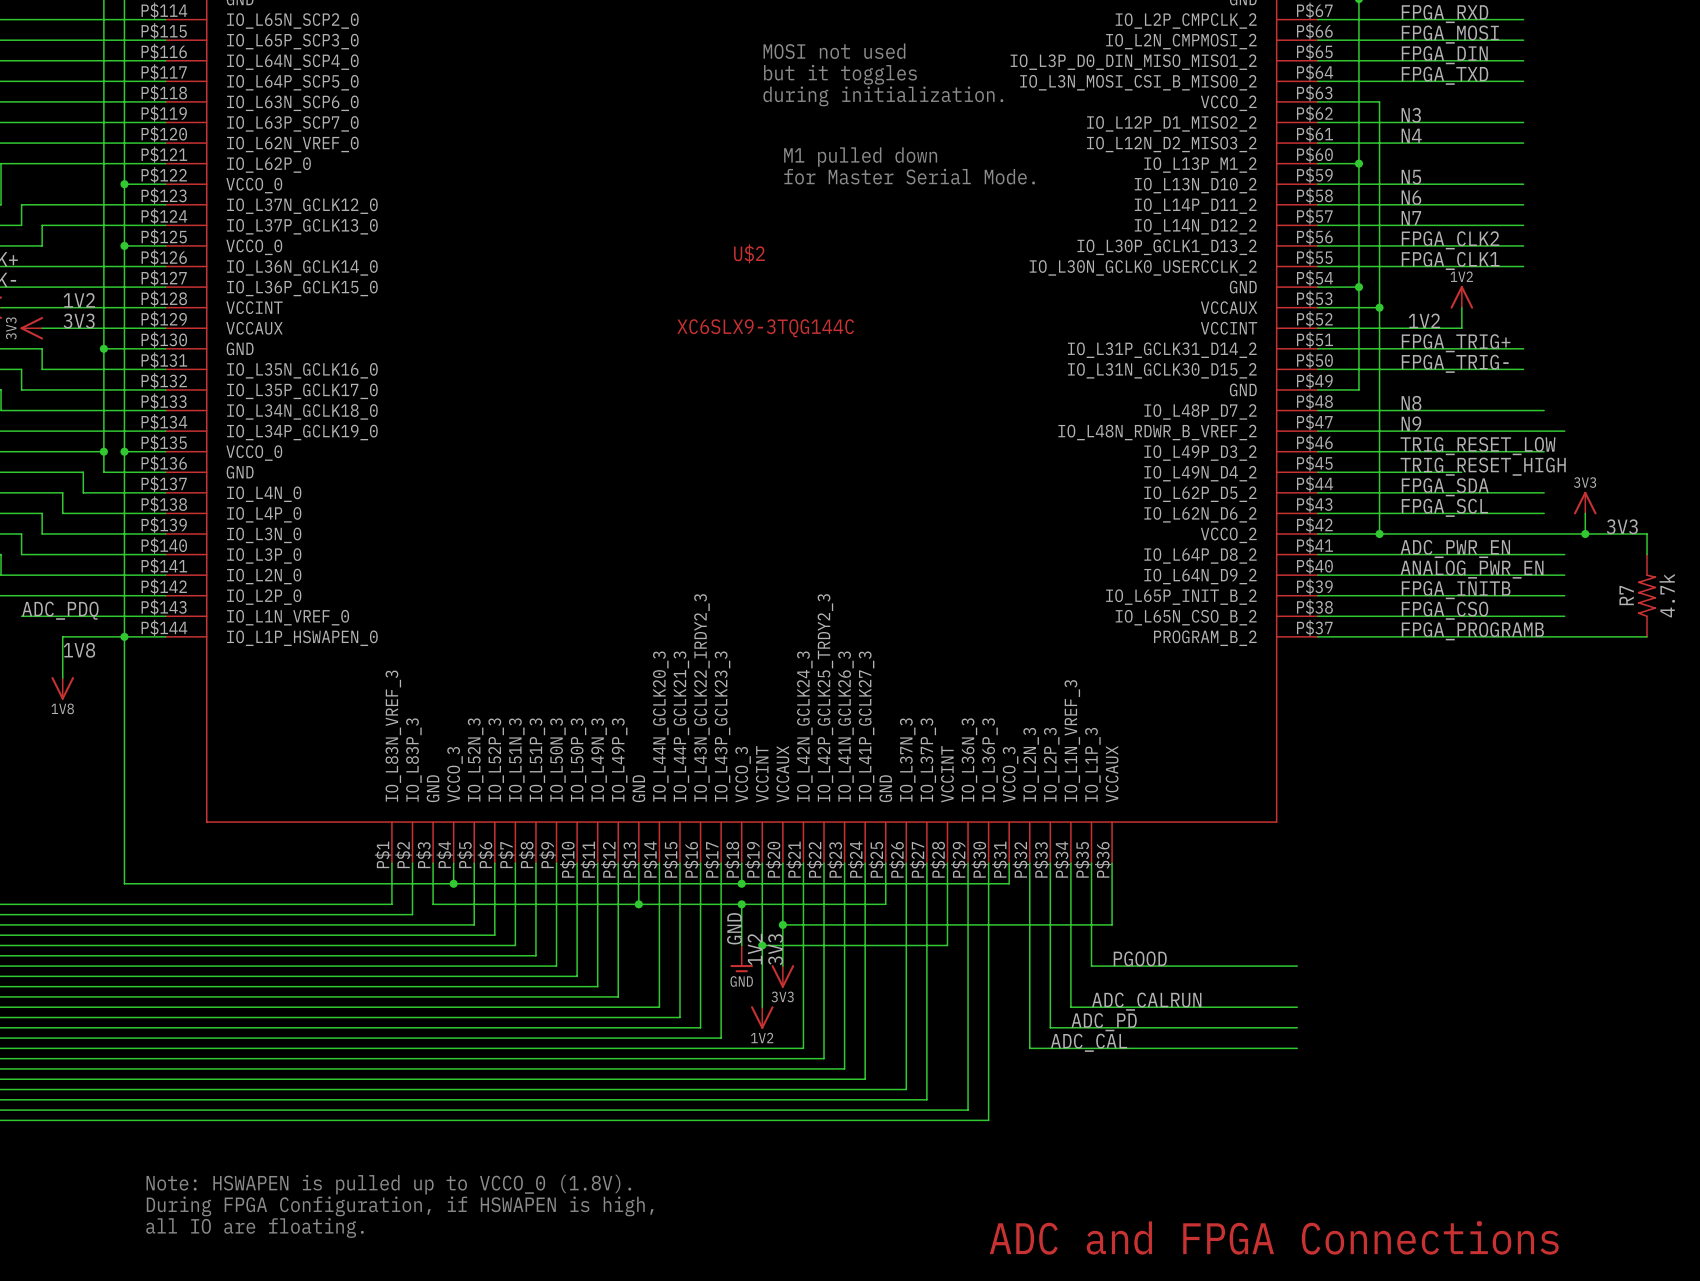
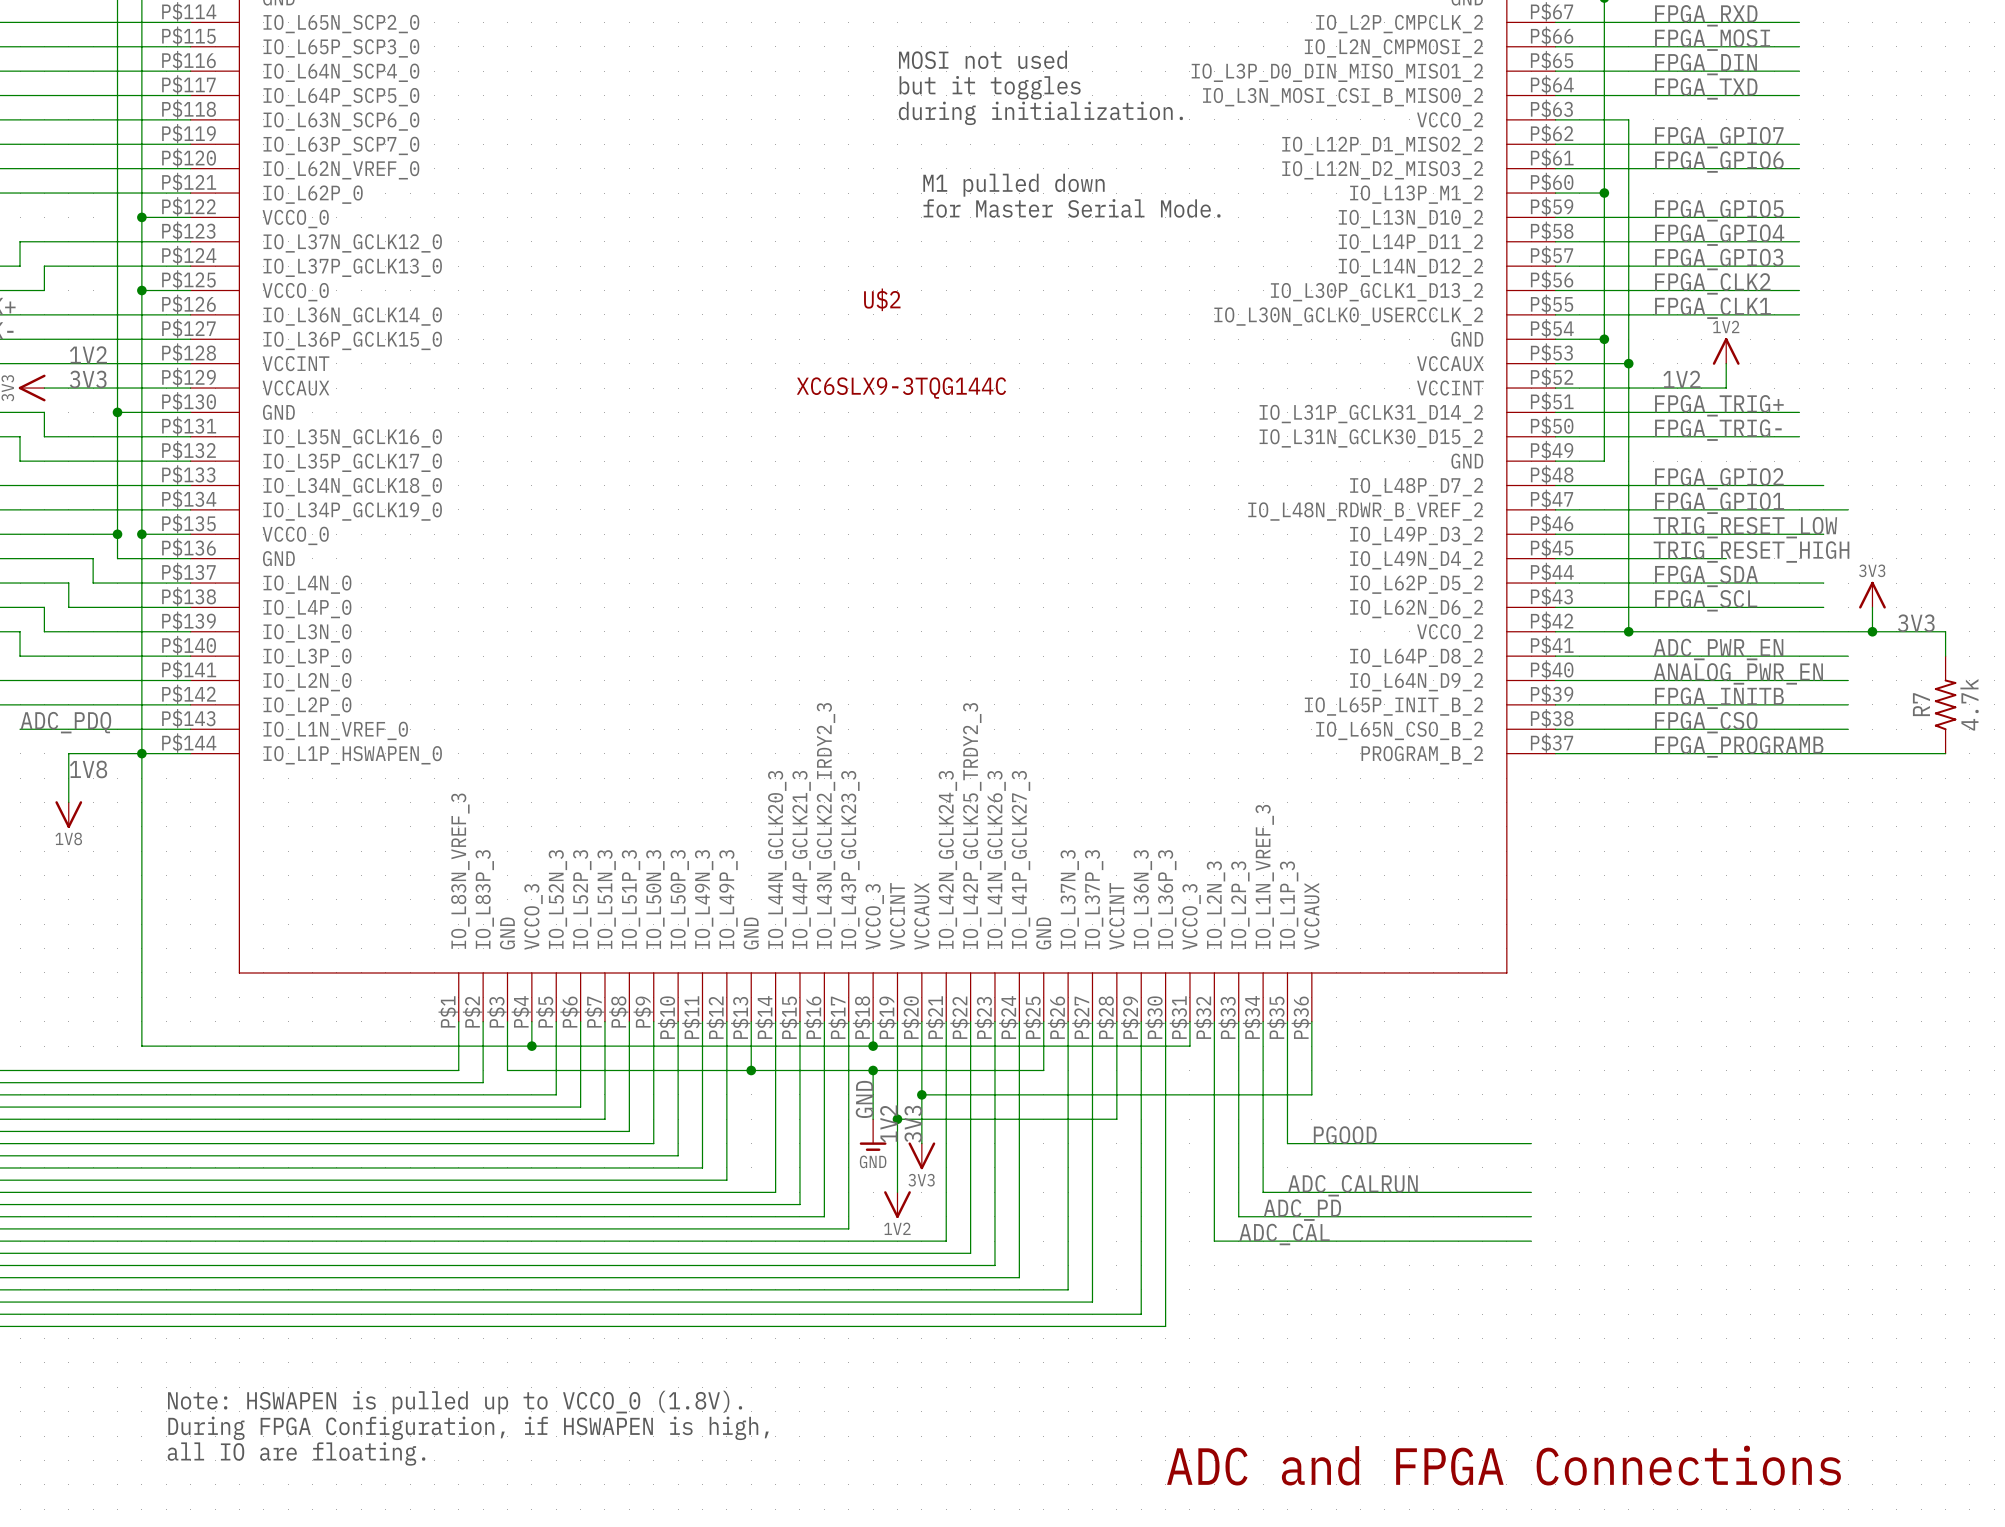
label: N3 (1411, 115) -> FPGA_GPIO7 (1719, 137)
label: N4 (1411, 135) -> FPGA_GPIO6 (1719, 162)
label: N5 (1411, 177) -> FPGA_GPIO5 (1719, 210)
label: N6 (1411, 197) -> FPGA_GPIO4 (1719, 235)
label: N7 (1411, 218) -> FPGA_GPIO3 (1719, 259)
label: N8 (1411, 403) -> FPGA_GPIO2 (1719, 478)
label: N9 (1411, 423) -> FPGA_GPIO1 (1719, 503)

